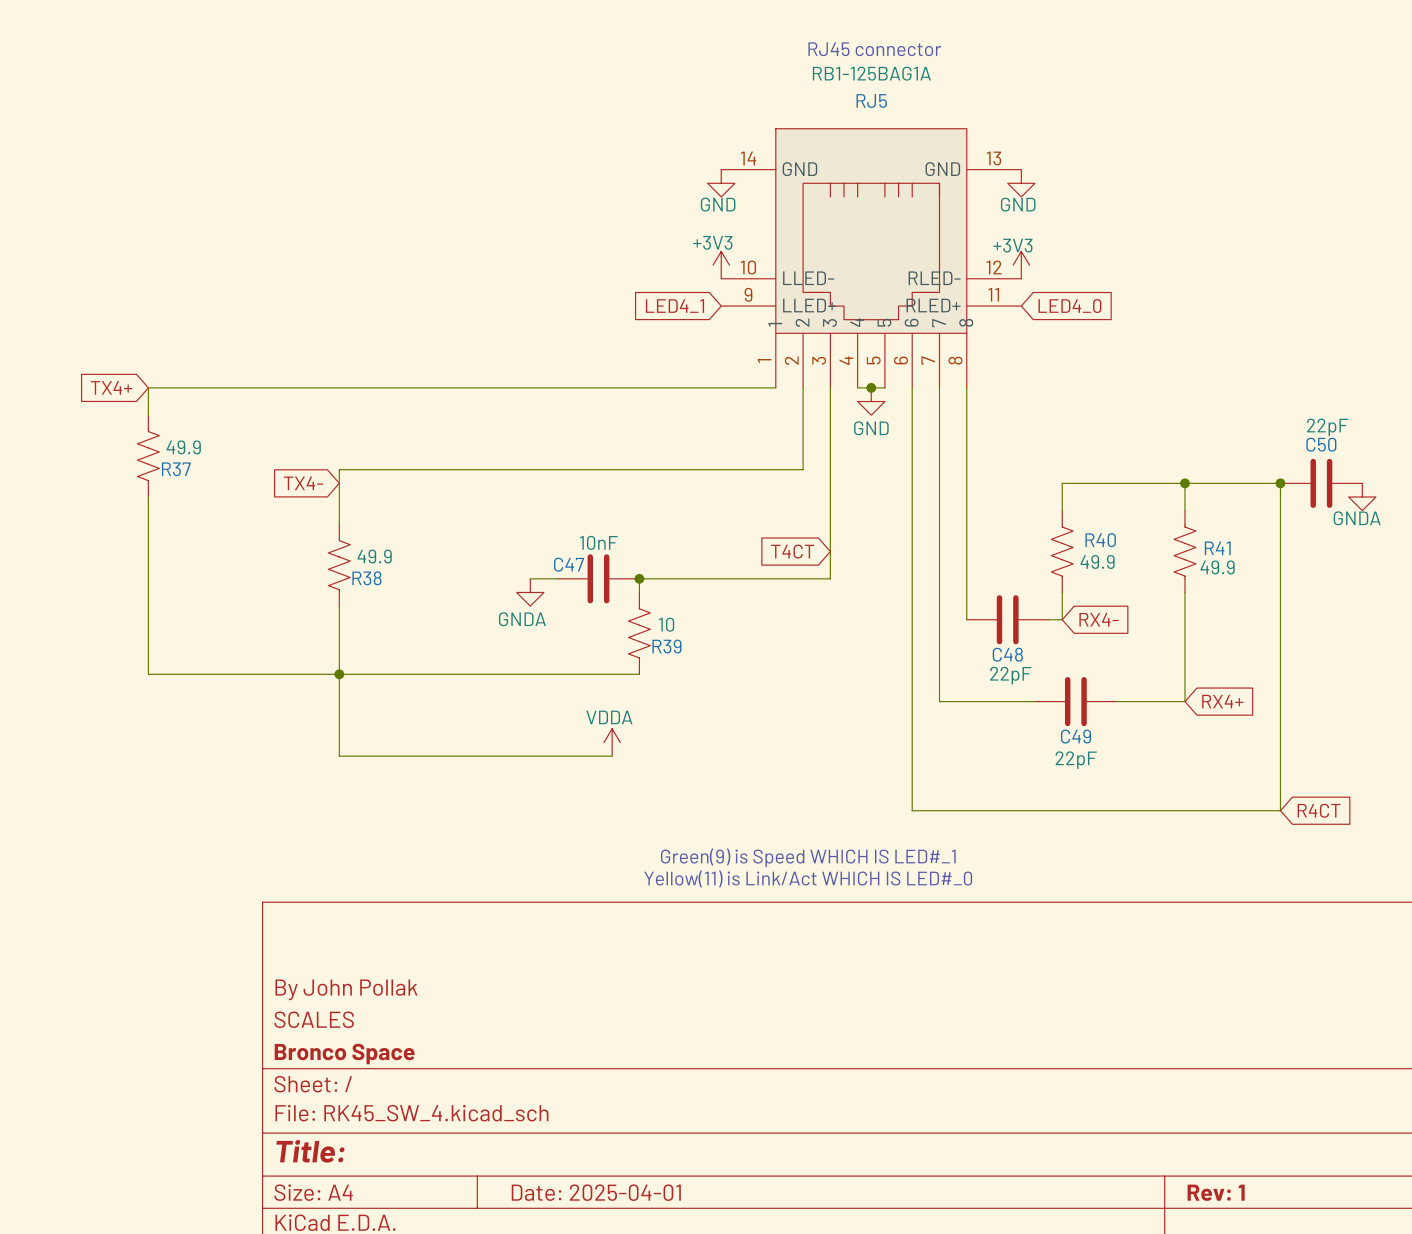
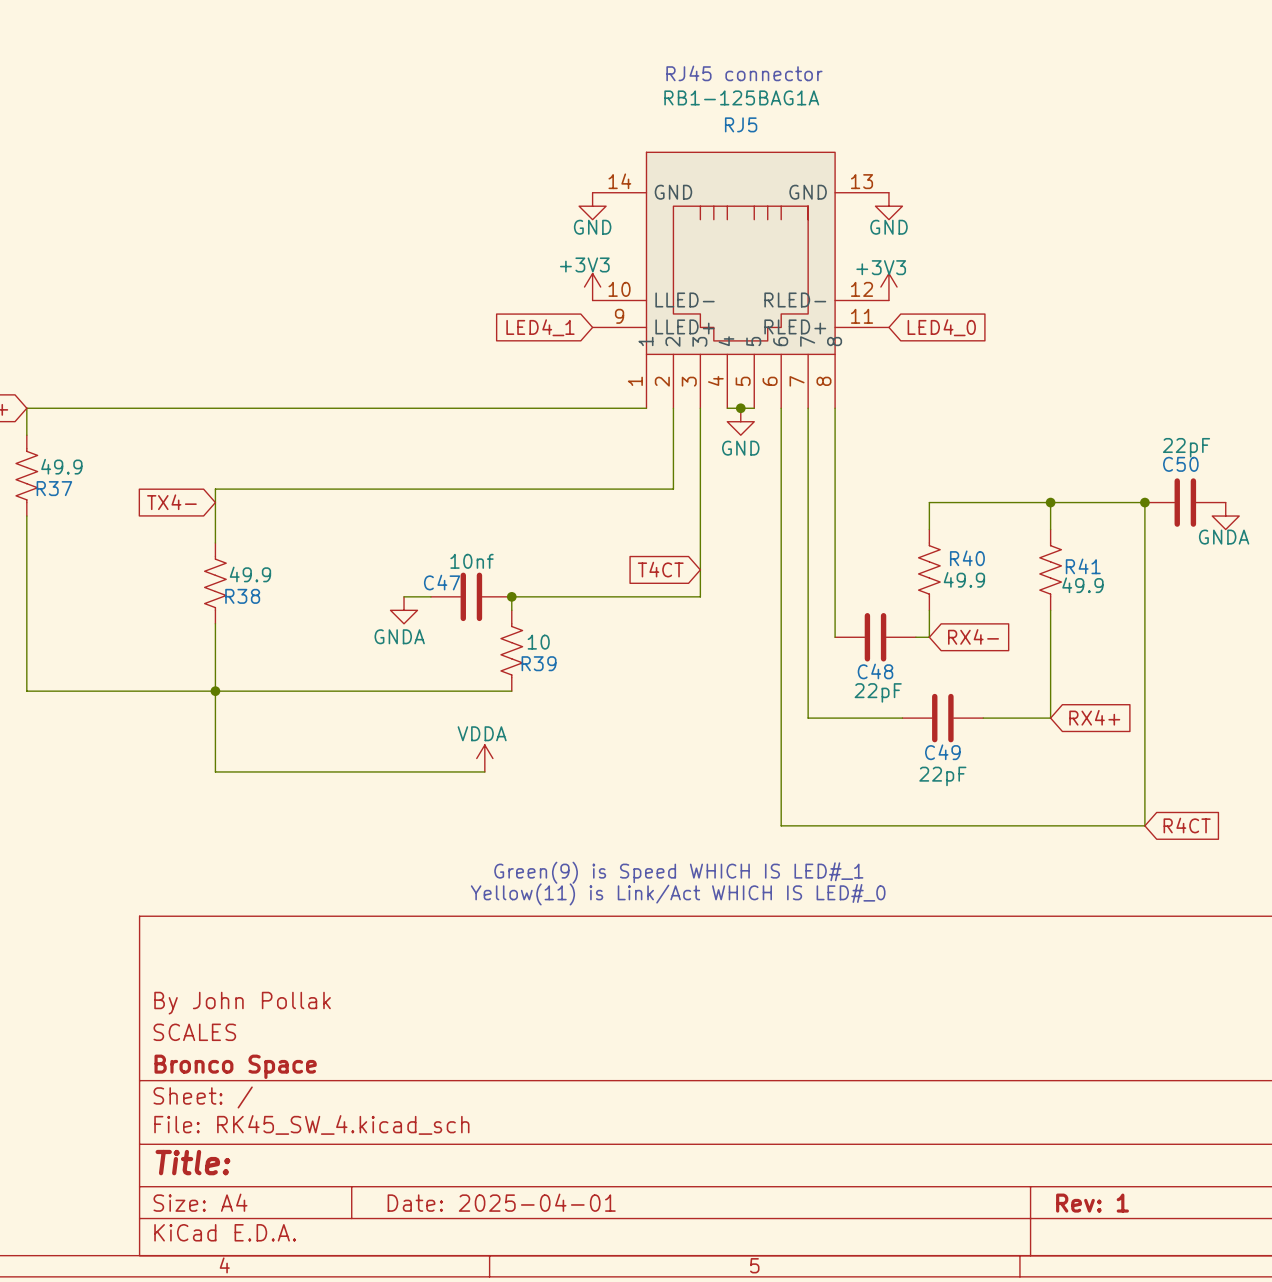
C47 value: 10nF (598, 542) -> 10nf (472, 561)

